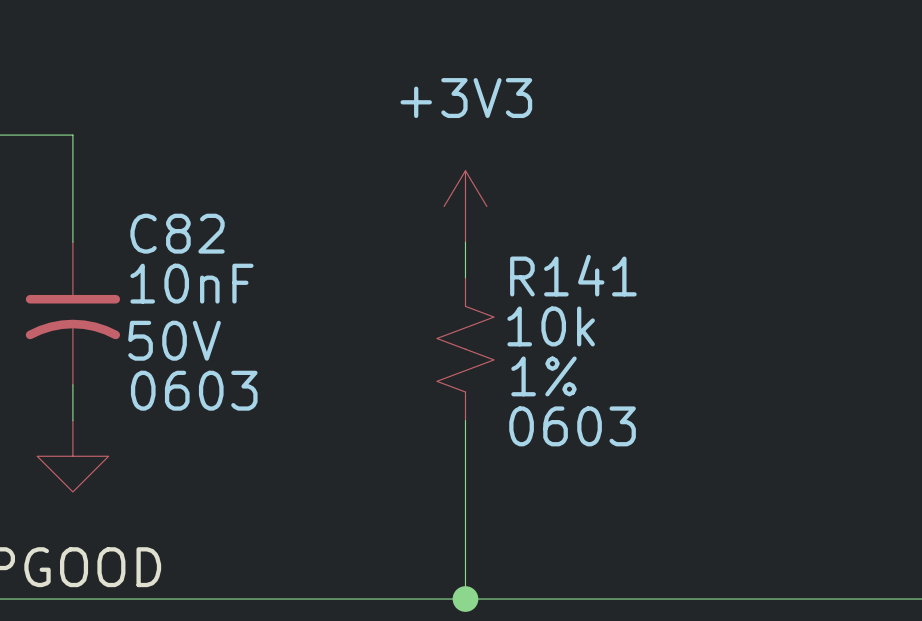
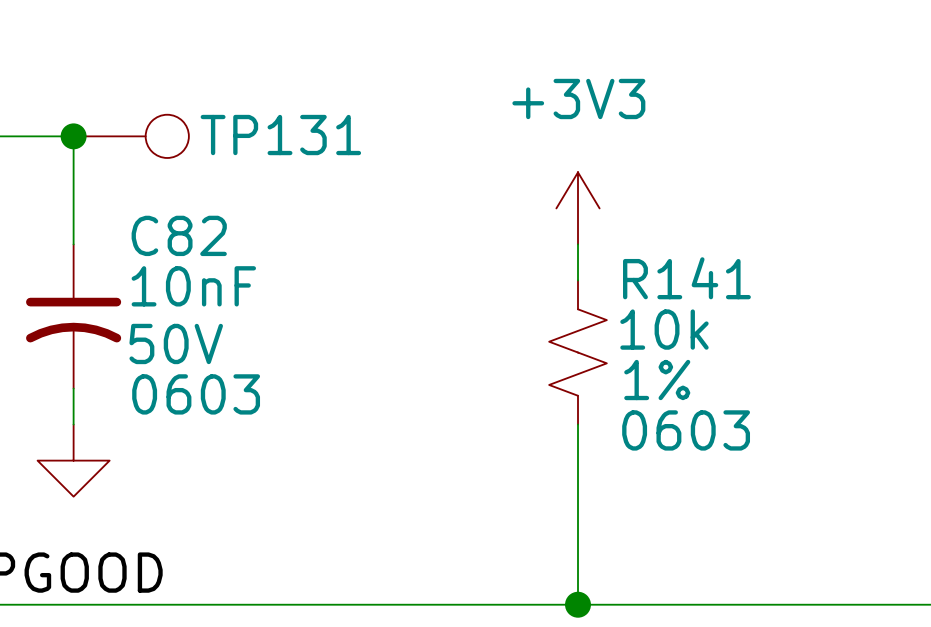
junction: none -> (73, 136)
TP131: none -> (131, 136)
power symbol position: +3V3 (465, 206) -> +3V3 (578, 208)
wire: (465, 242) (465, 277) -> (578, 244) (578, 280)
R141 position: (465, 349) -> (578, 352)
wire: (465, 420) (465, 599) -> (578, 424) (578, 604)
junction position: (465, 599) -> (578, 604)

